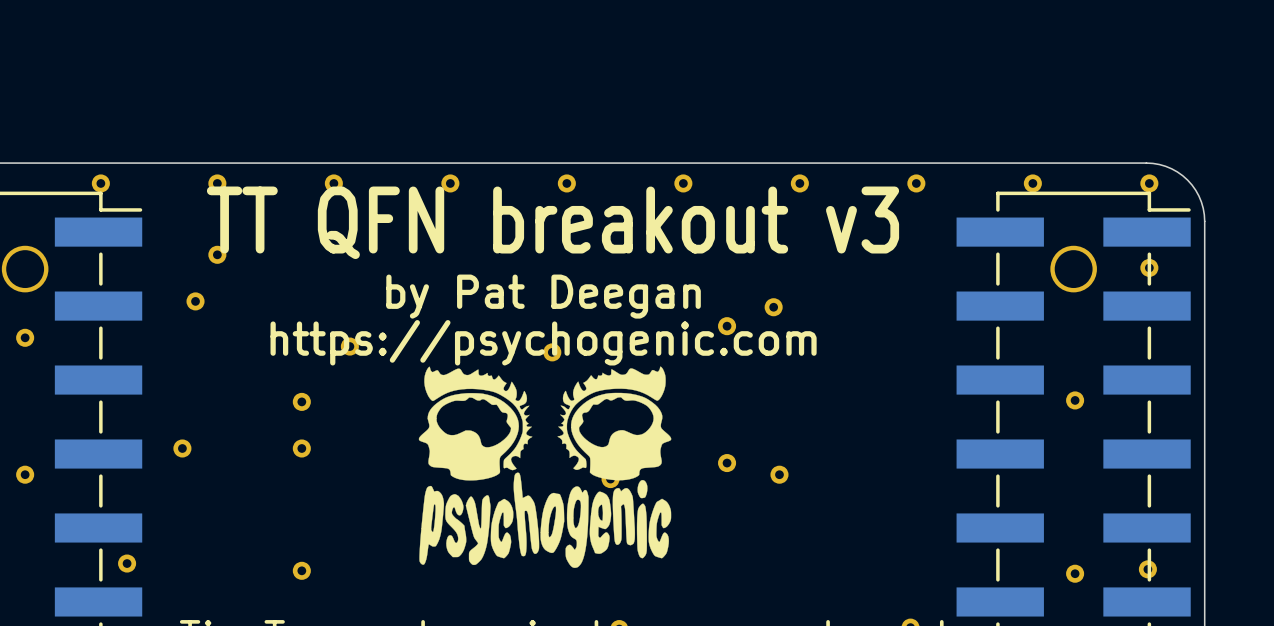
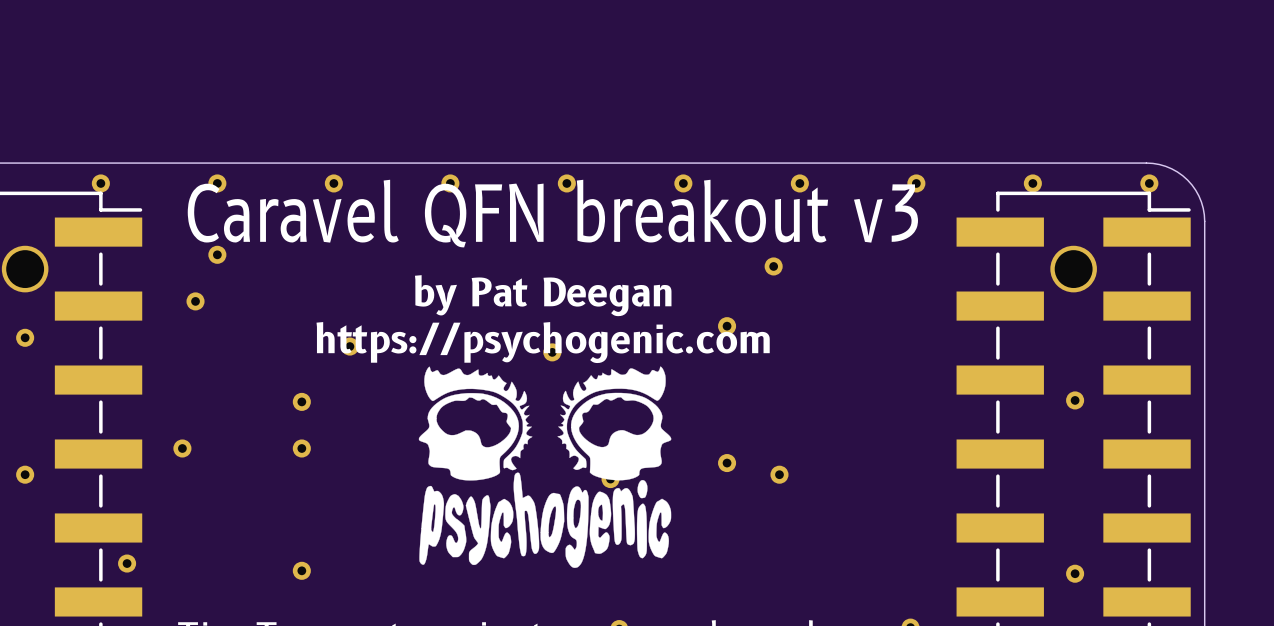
text: TT QFN breakout v3 (553, 222) -> Caravel QFN breakout v3 (552, 213)
part: (1149, 267) -> none
part position: (773, 307) -> (773, 266)
part: (1147, 569) -> none

